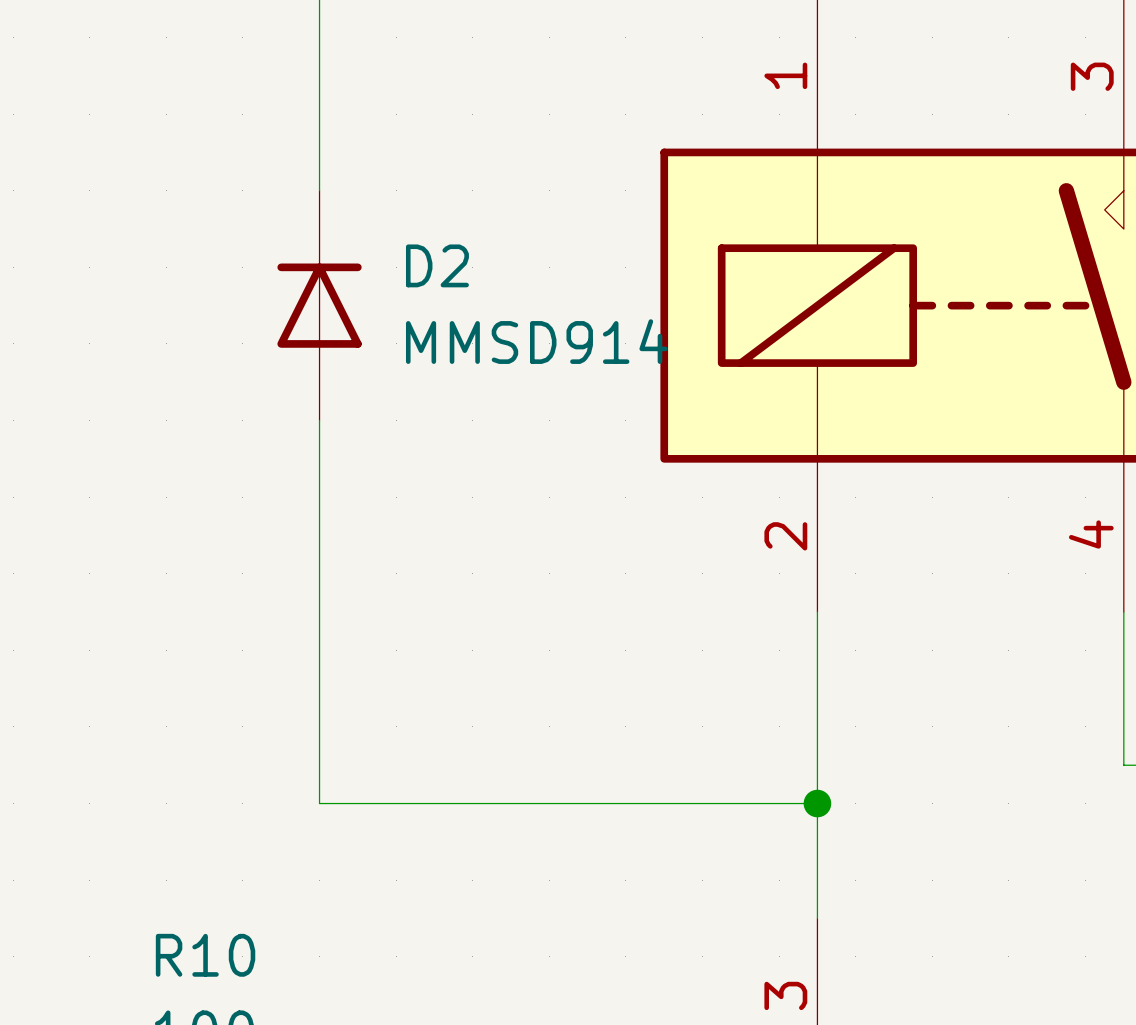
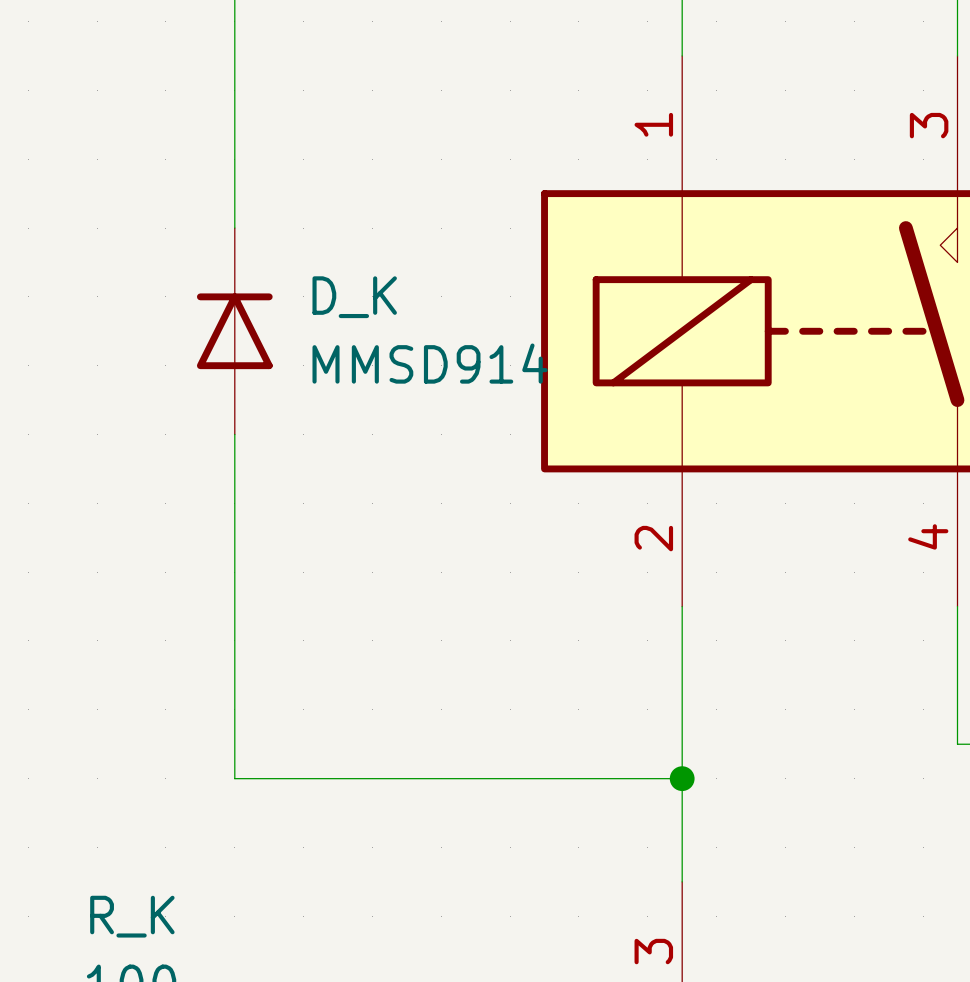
D2 name: D2 (437, 265) -> D_K (354, 297)
R10 name: R10 (205, 955) -> R_K (132, 916)

